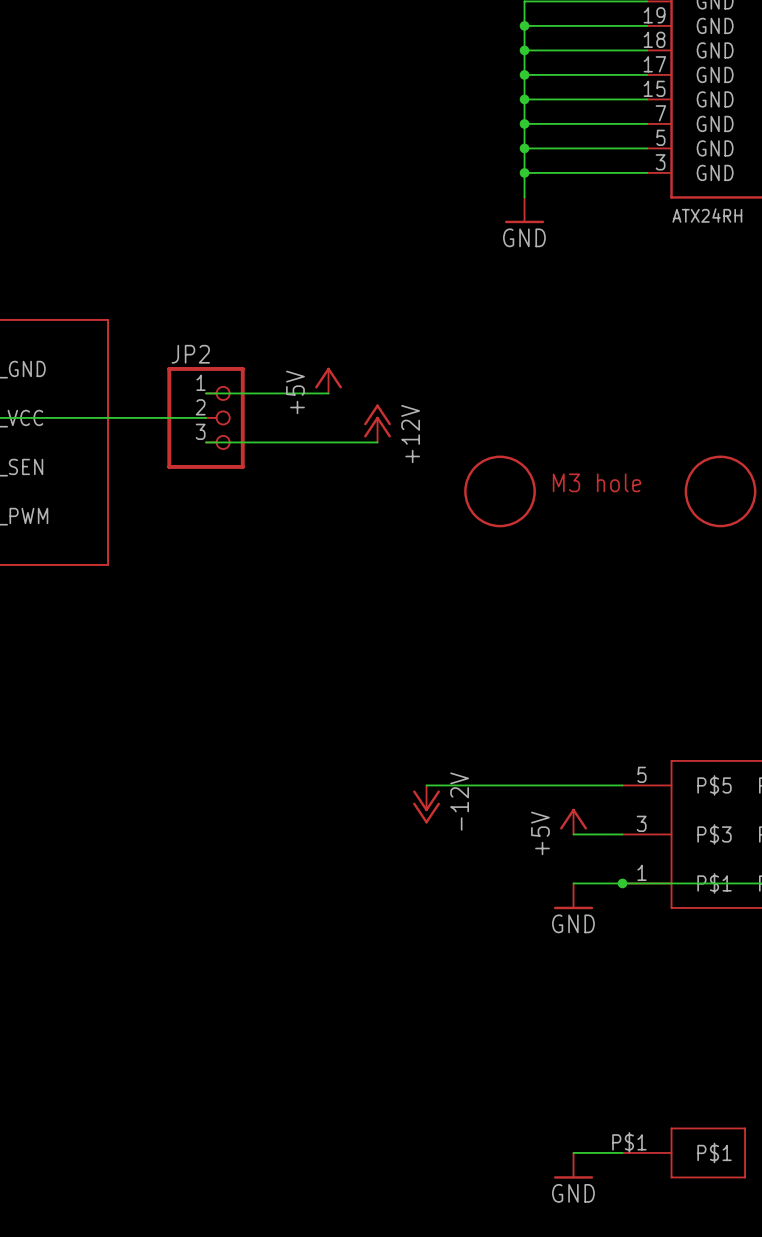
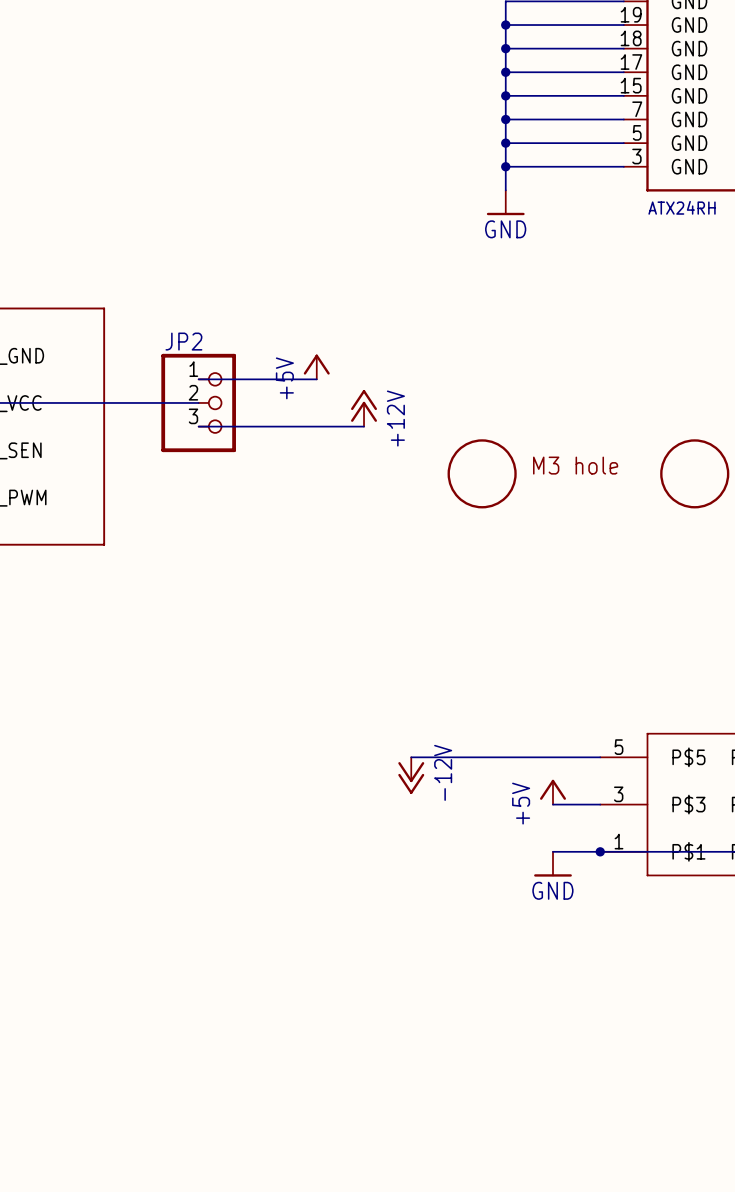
wire: (573, 1152) (622, 1152) -> none
part: (684, 1152) -> none
power symbol: GND (573, 1165) -> none

